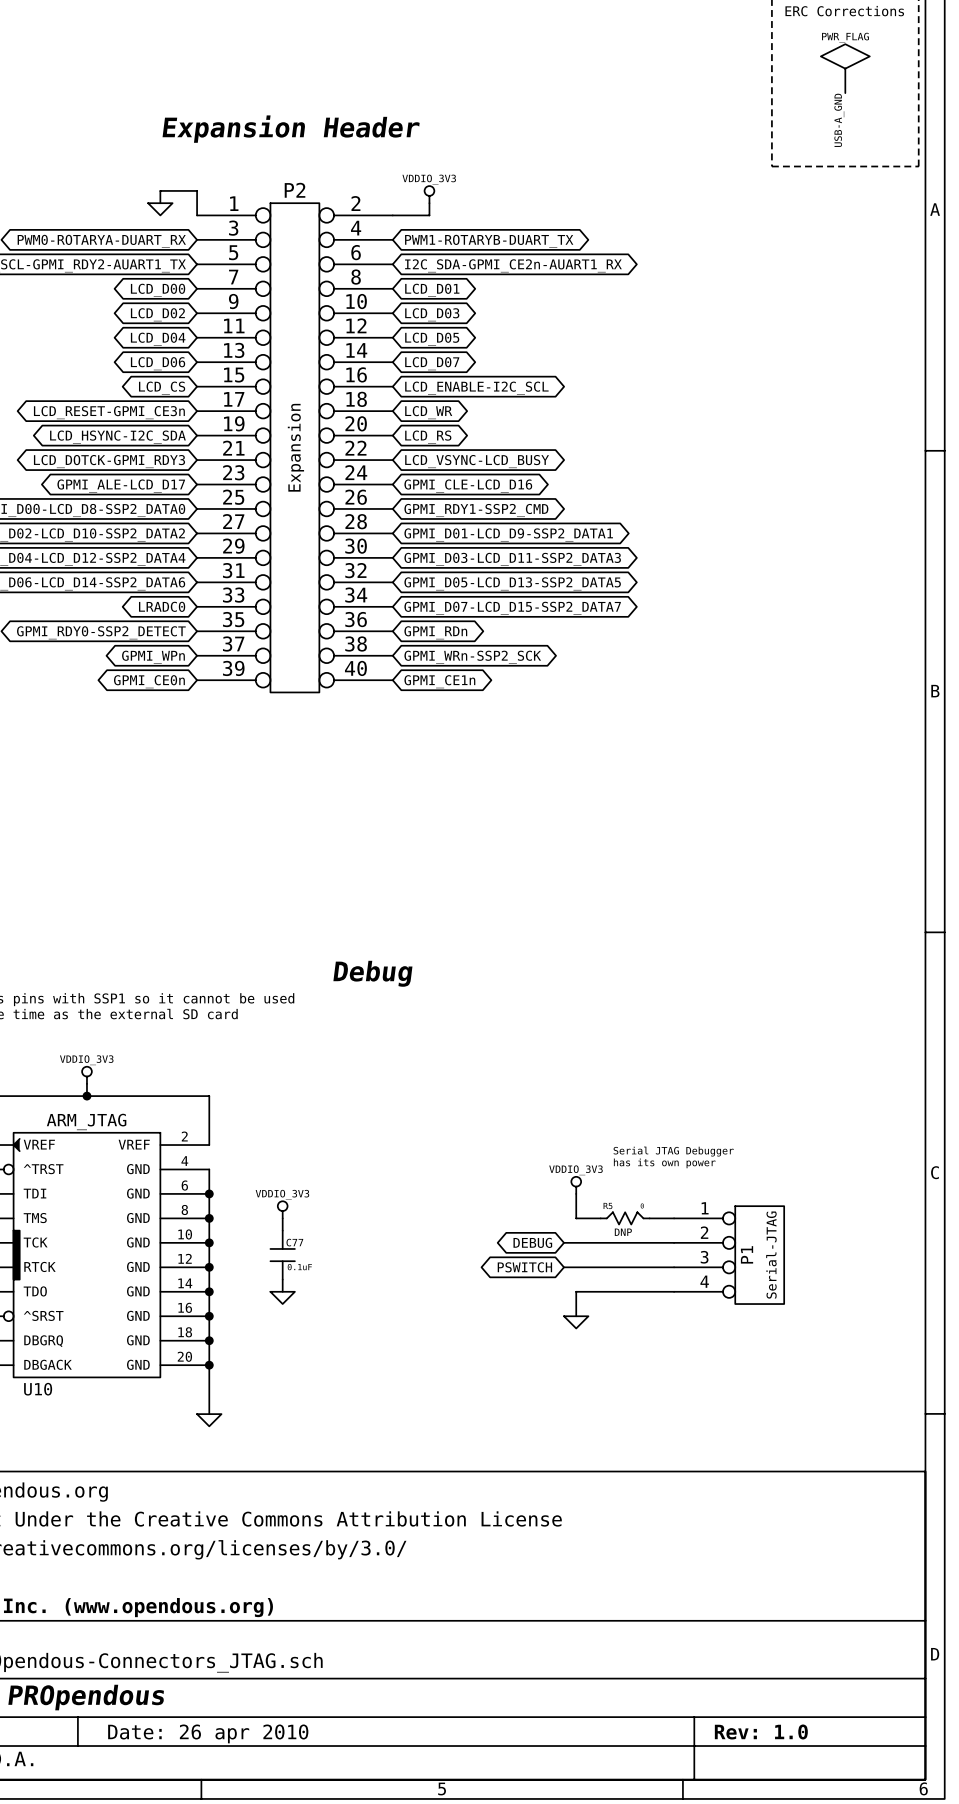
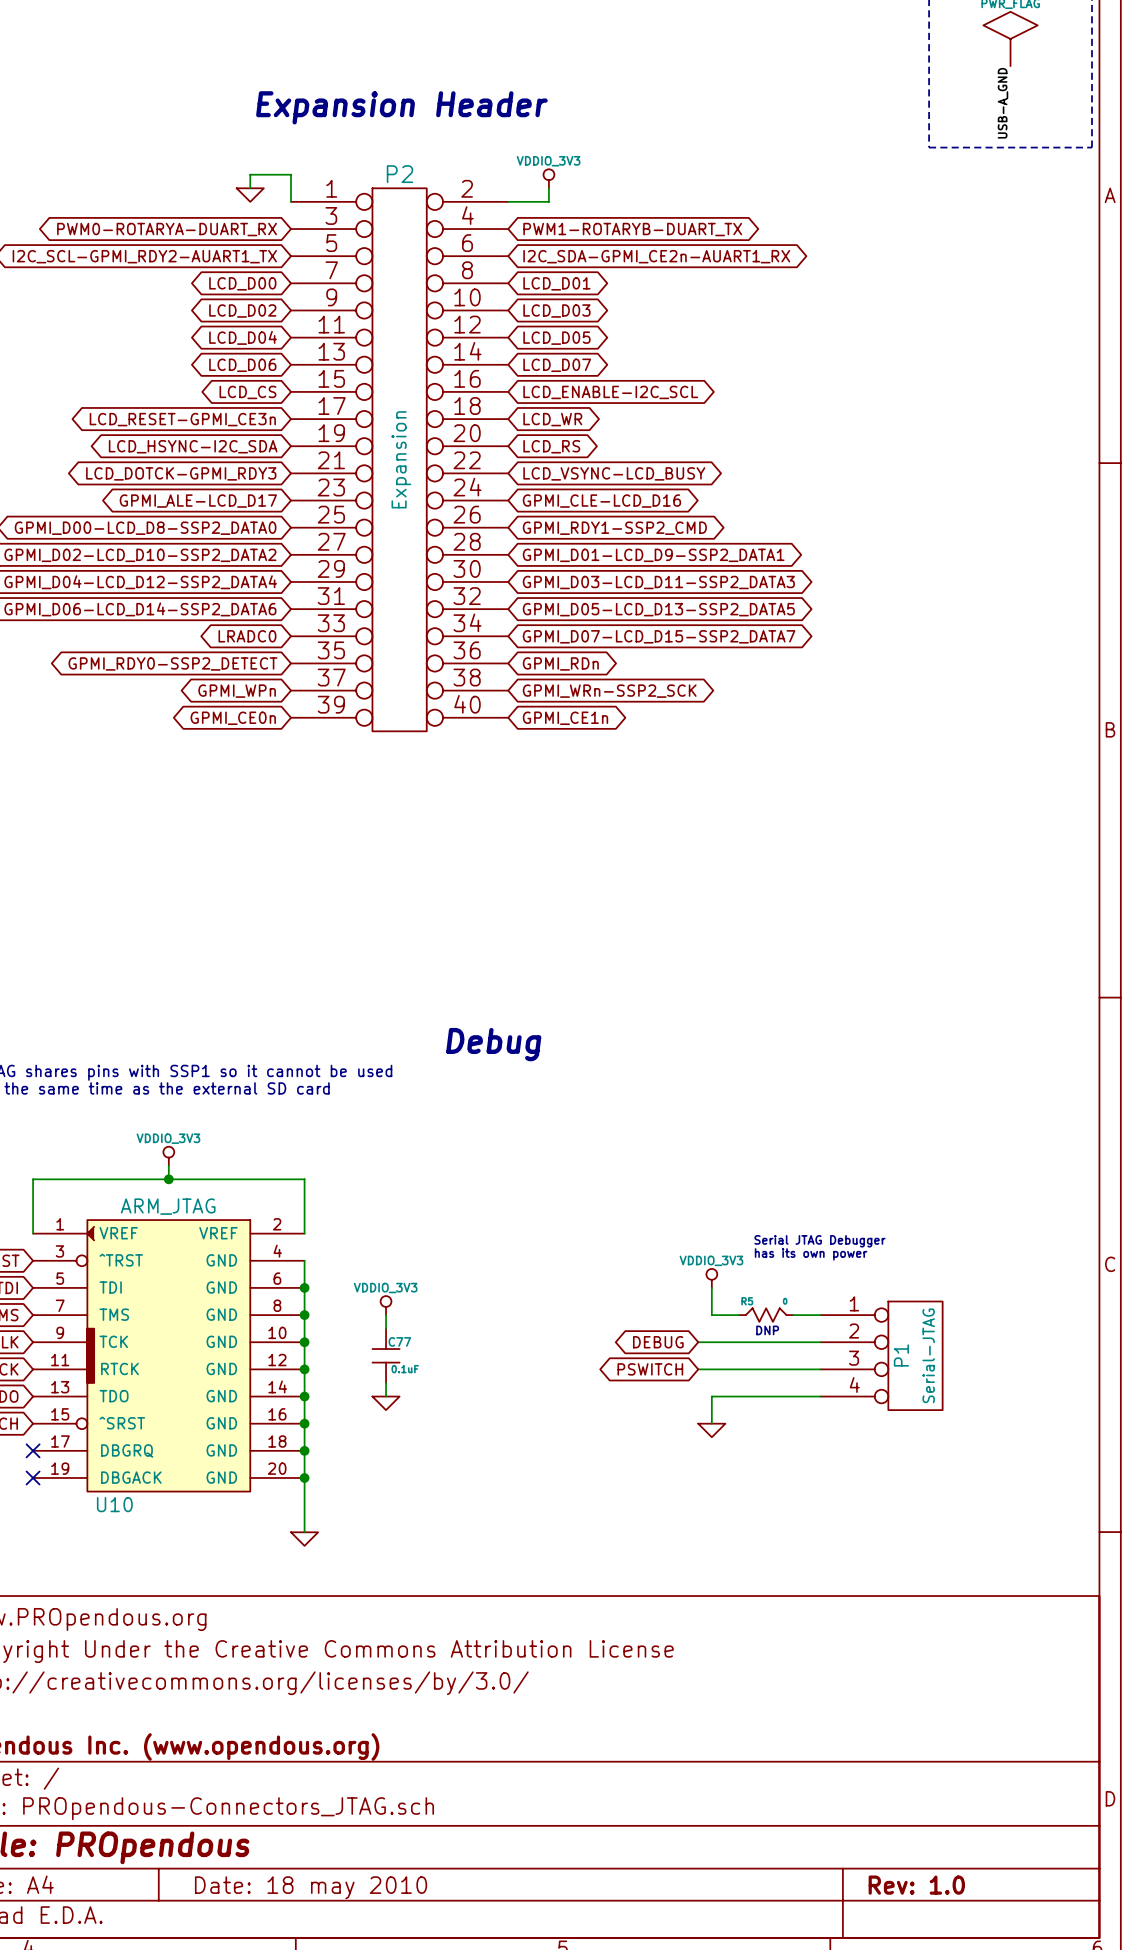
title block: Date: 26 apr 2010 (208, 1733) -> Date: 18 may 2010 (311, 1887)

